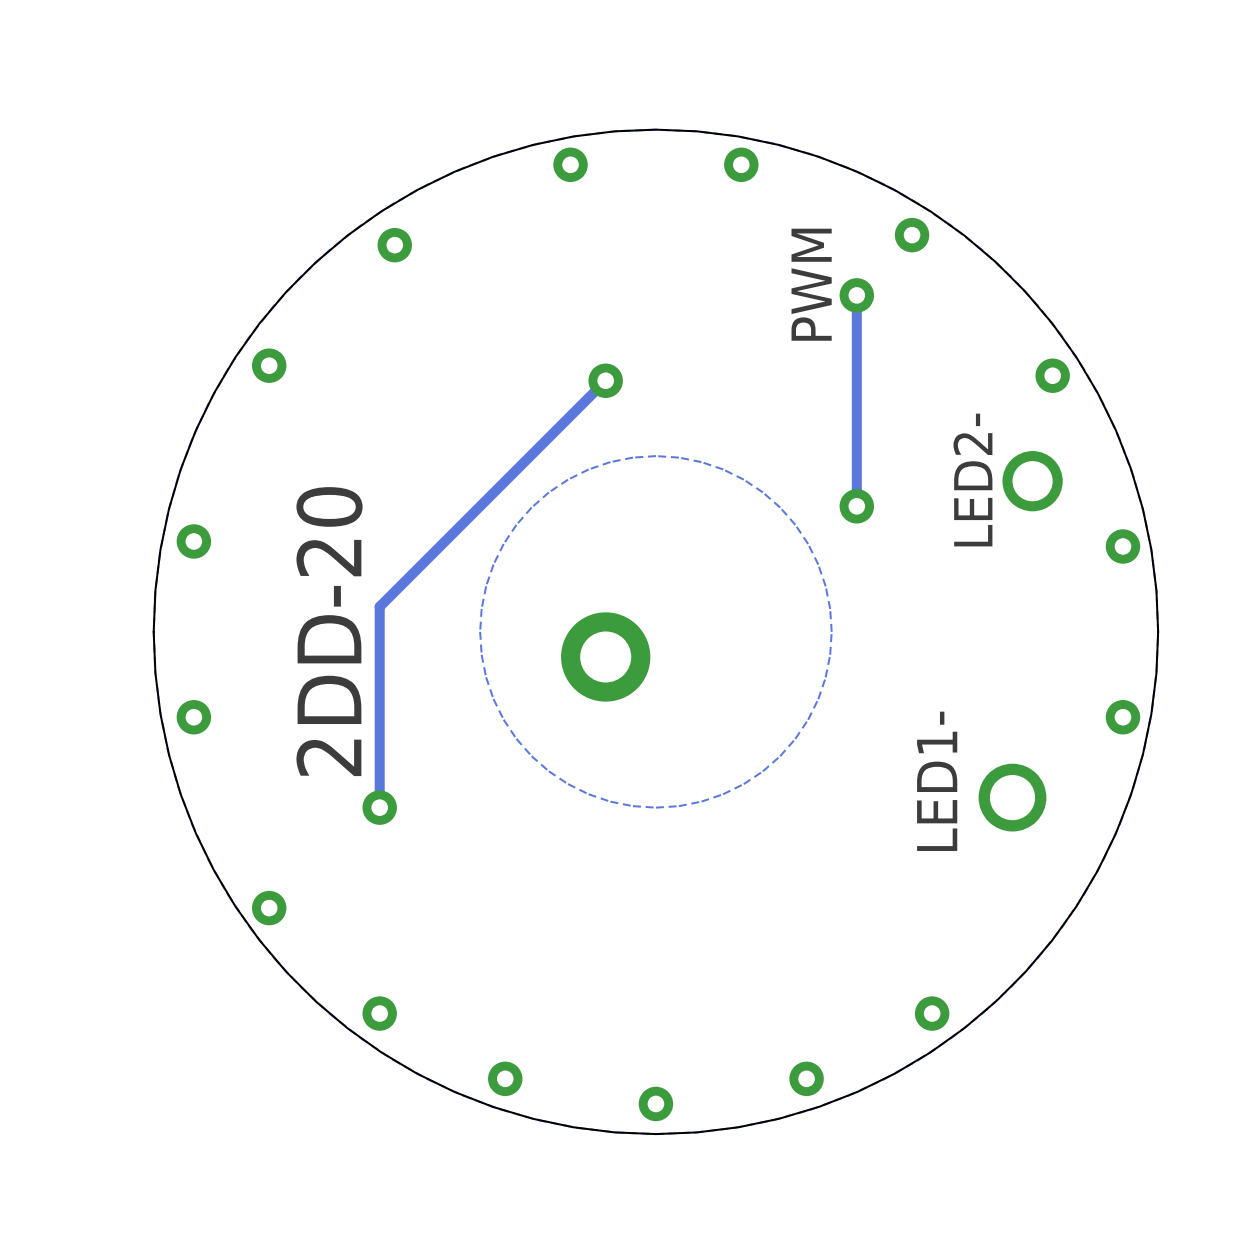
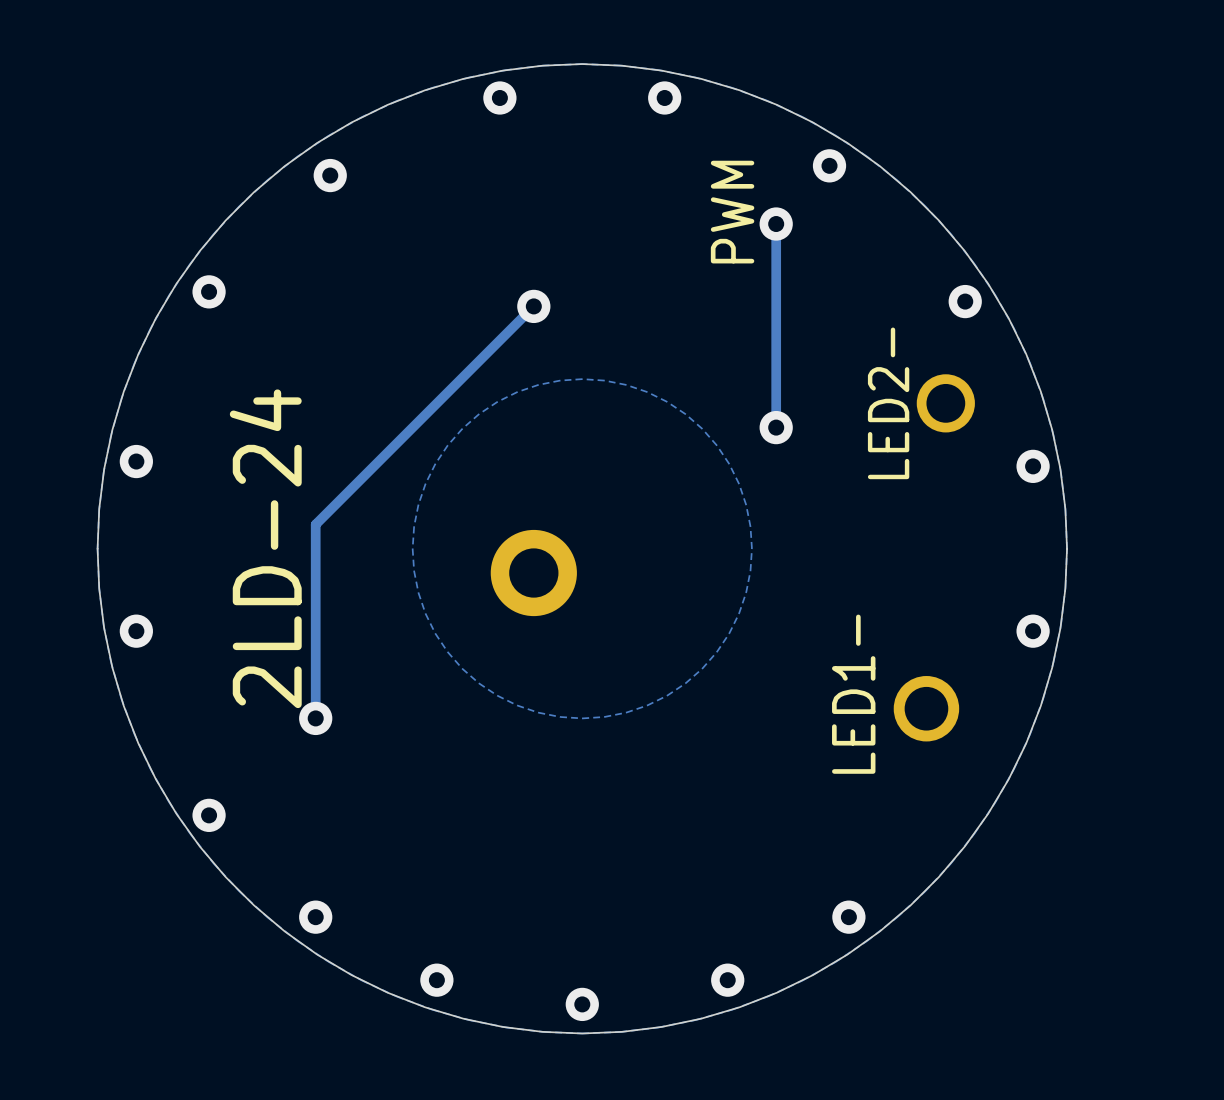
text: 2DD-20 (329, 631) -> 2LD-24 (265, 548)

